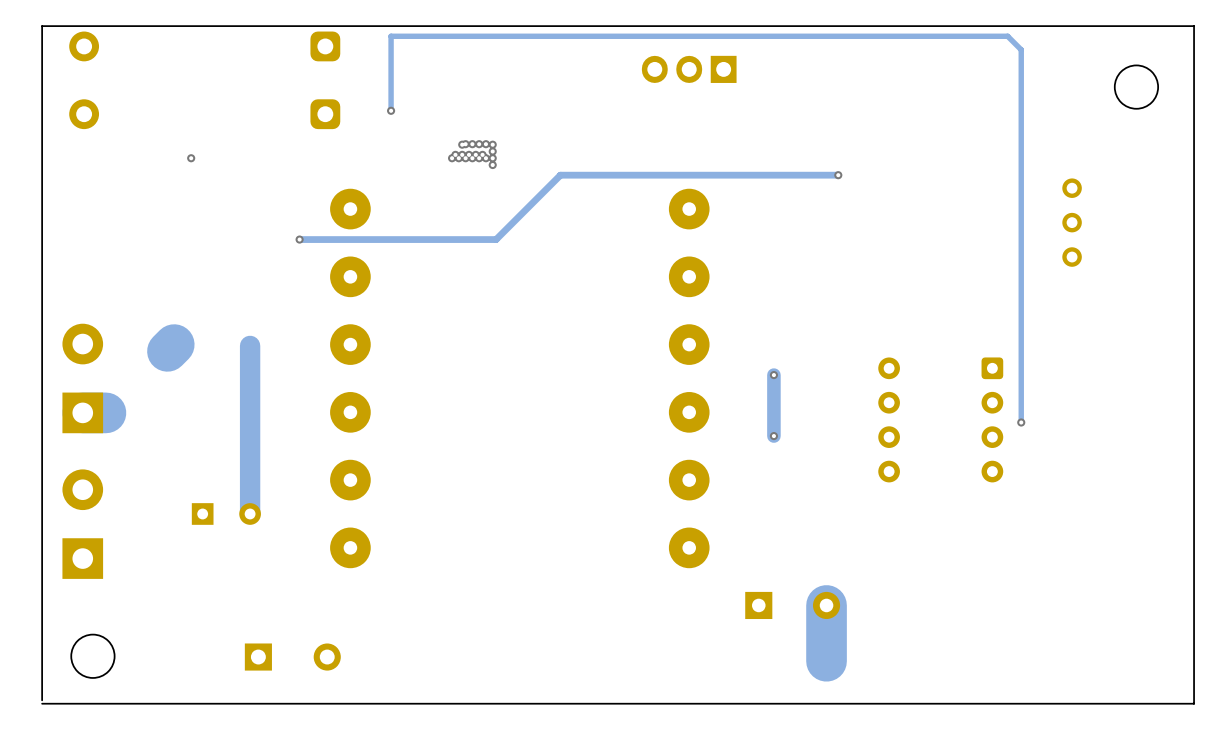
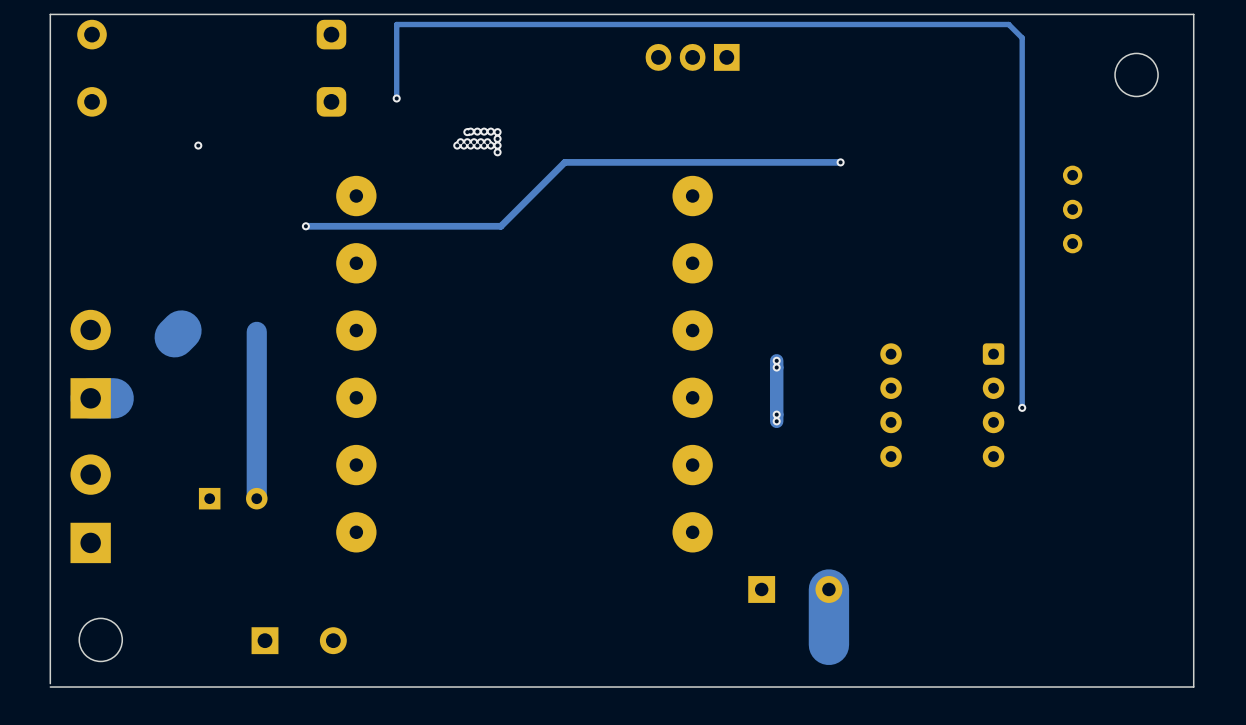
via: none -> (776, 367)
via: none -> (776, 414)

